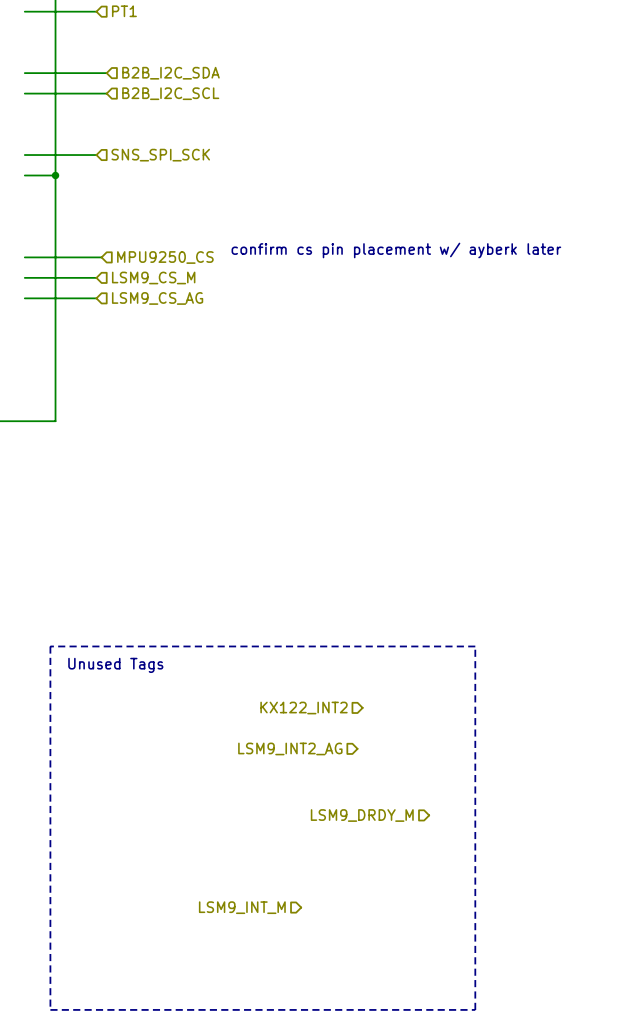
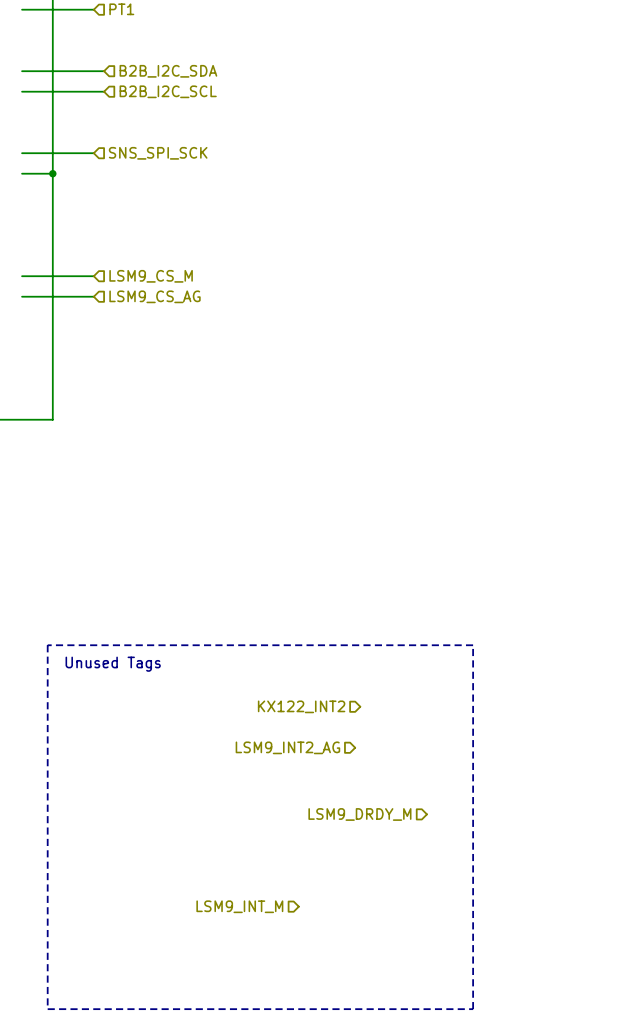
text: confirm cs pin placement w/ ayberk later (396, 250) -> none
wire: (24, 257) (101, 257) -> none
hierarchical label: MPU9250_CS (165, 257) -> none

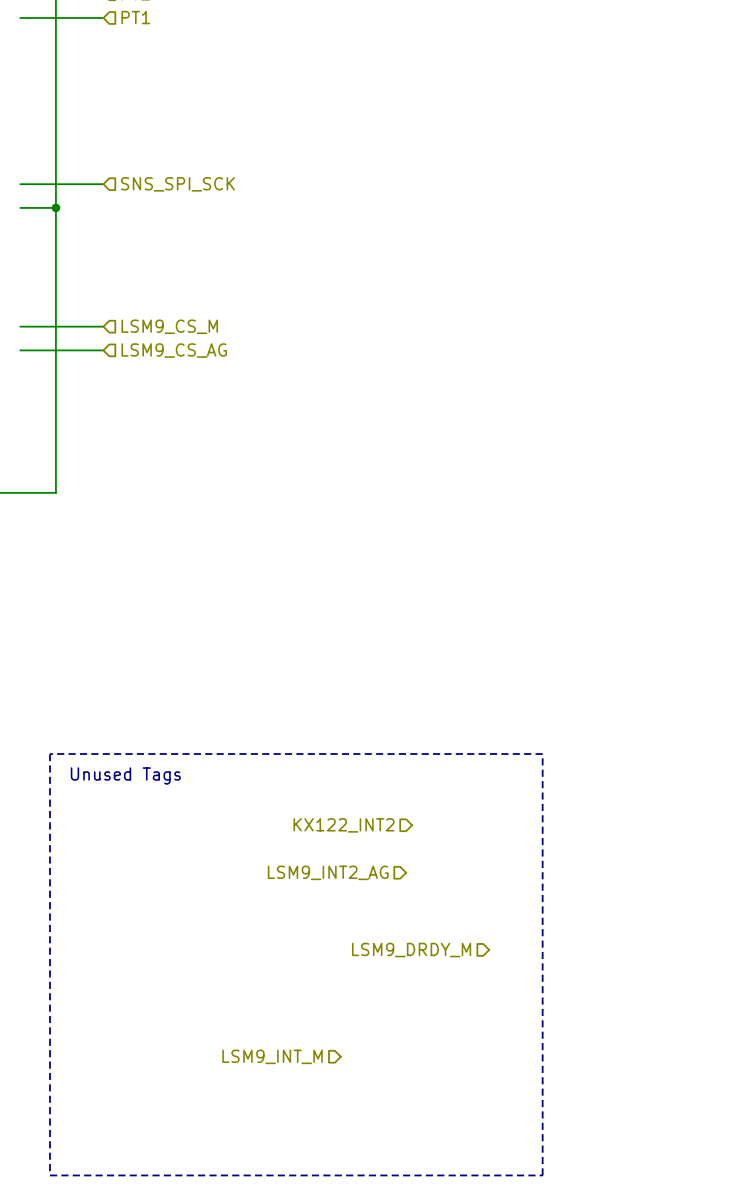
wire: (22, 71) (104, 71) -> none
hierarchical label: B2B_I2C_SDA (168, 71) -> none
wire: (22, 91) (104, 91) -> none
hierarchical label: B2B_I2C_SCL (168, 91) -> none

